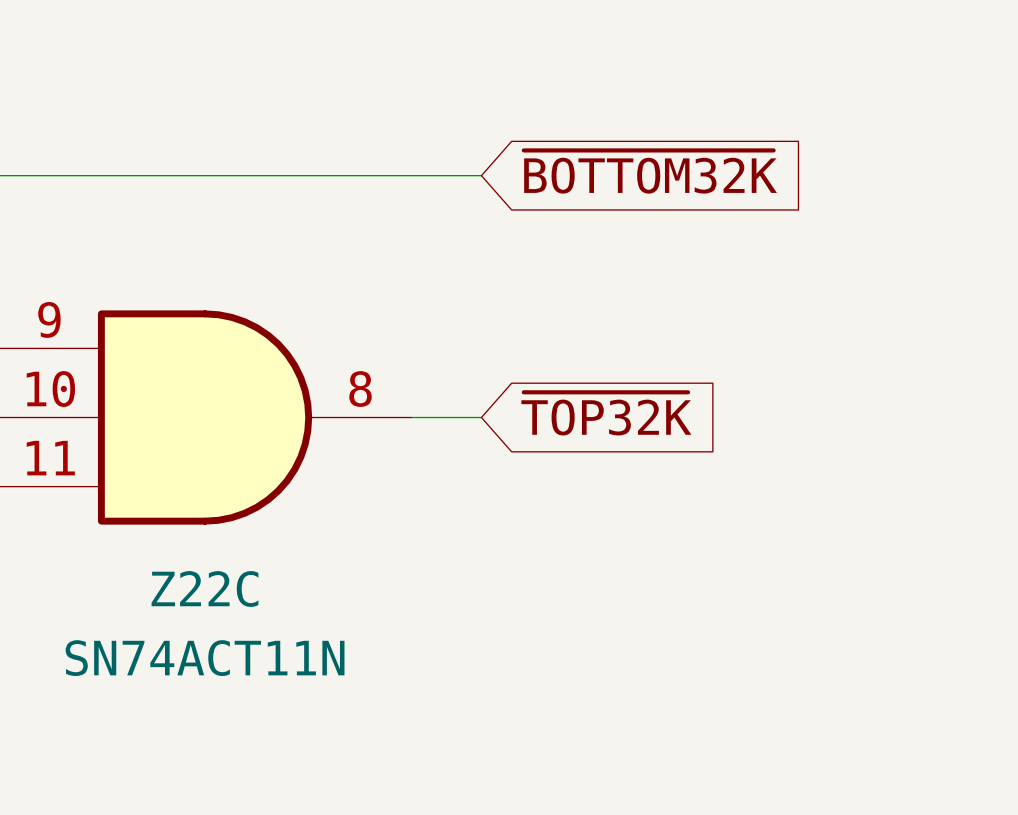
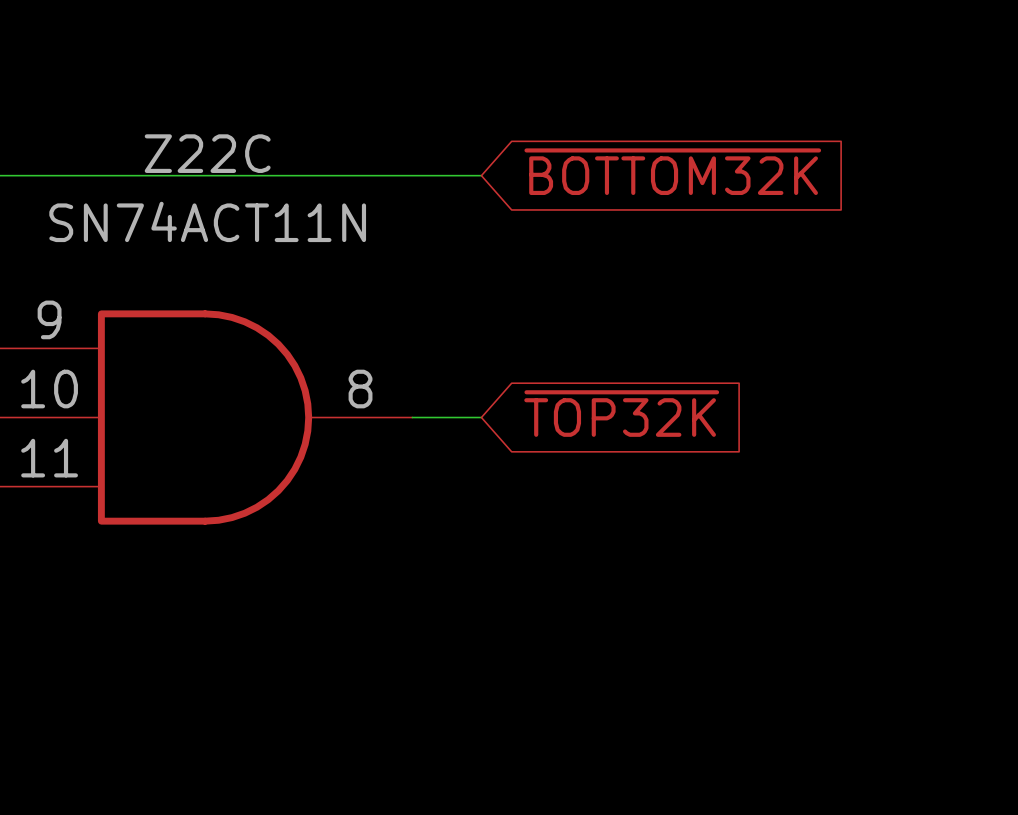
Z22C name position: Z22C (205, 589) -> Z22C (207, 153)
Z22C value position: SN74ACT11N (205, 658) -> SN74ACT11N (207, 221)

